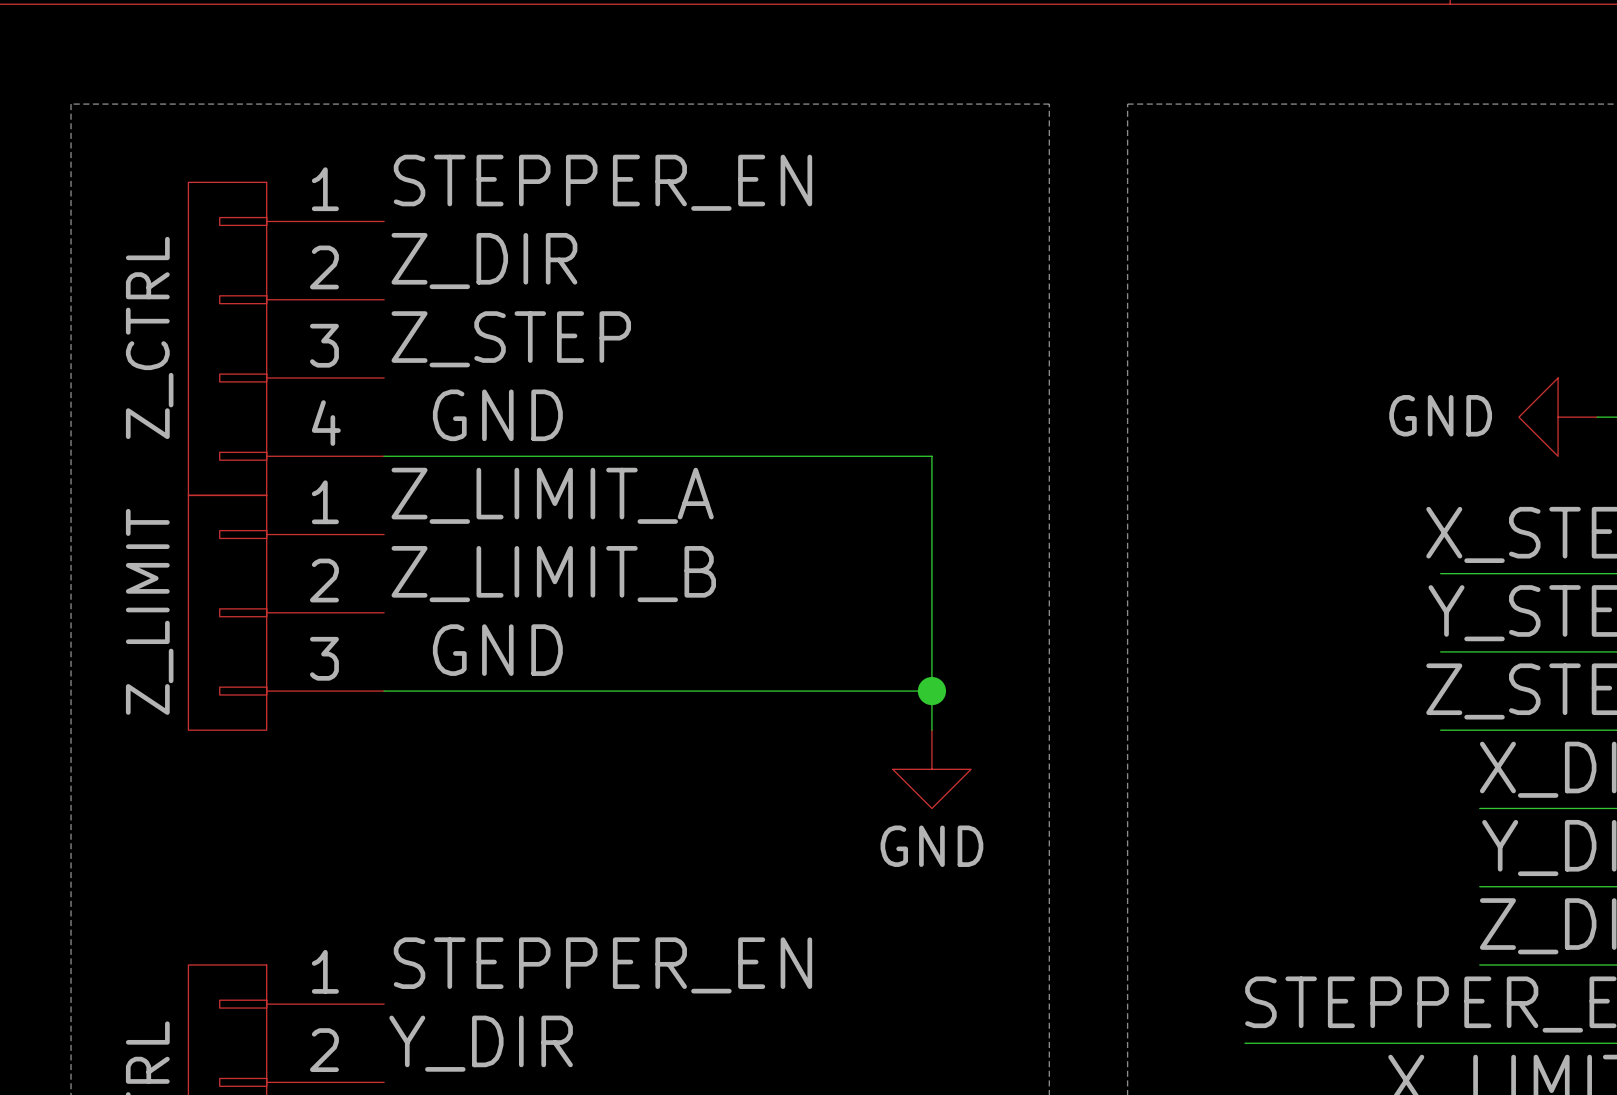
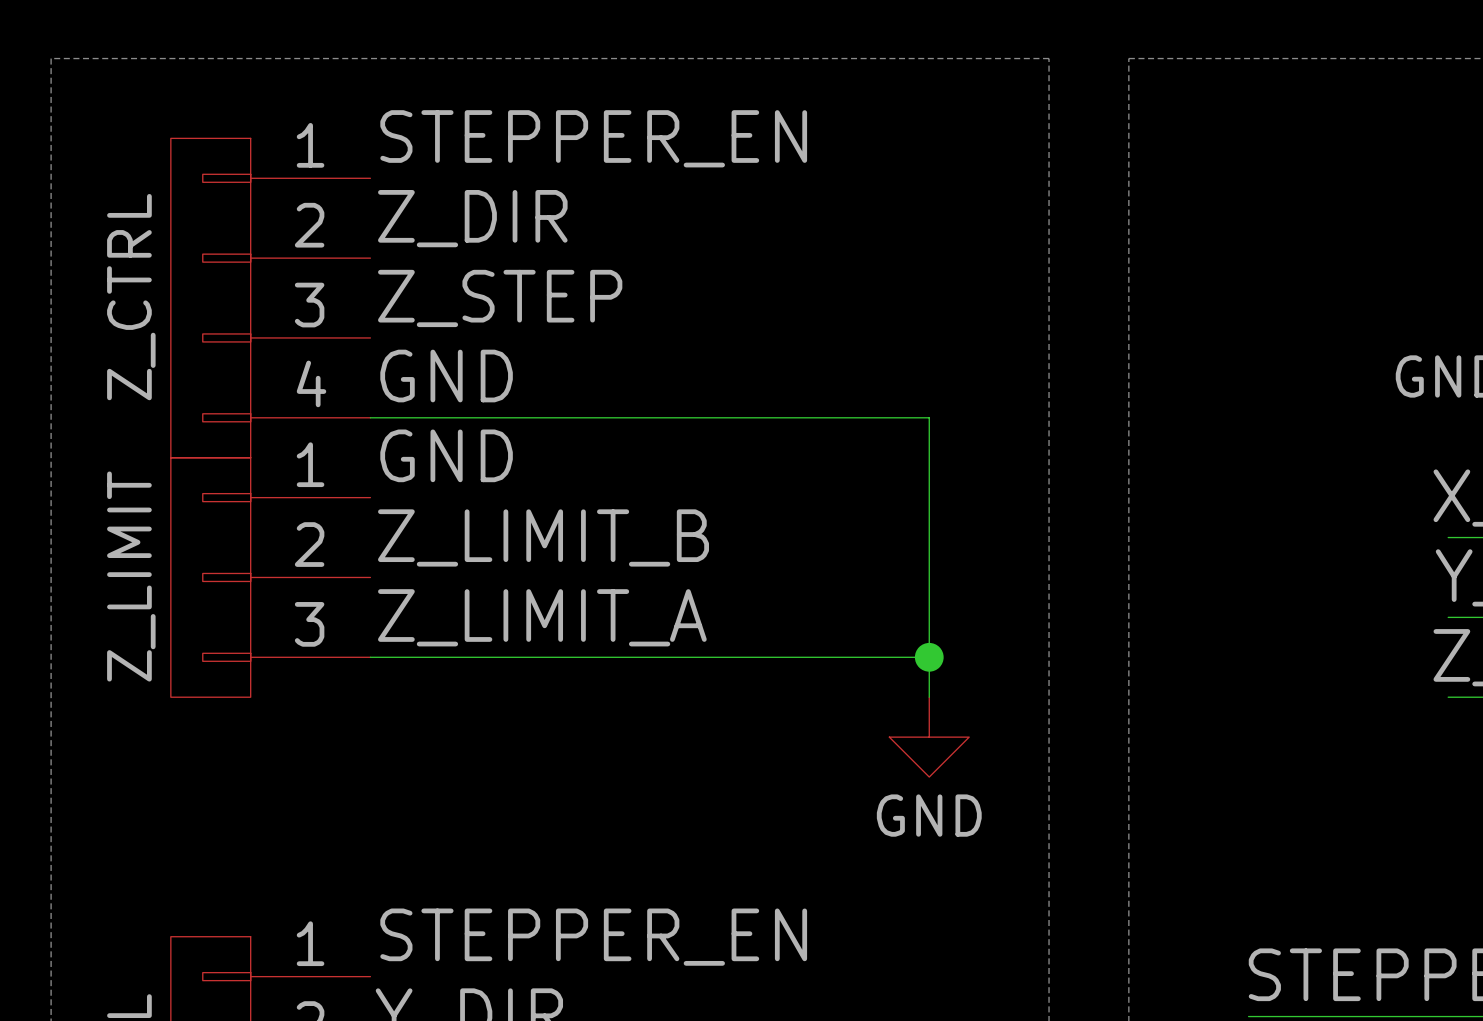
label position: GND (497, 415) -> GND (446, 376)
label: Z_LIMIT_A (552, 495) -> GND (446, 455)
label: GND (497, 650) -> none
label: none -> Z_LIMIT_A (542, 617)

